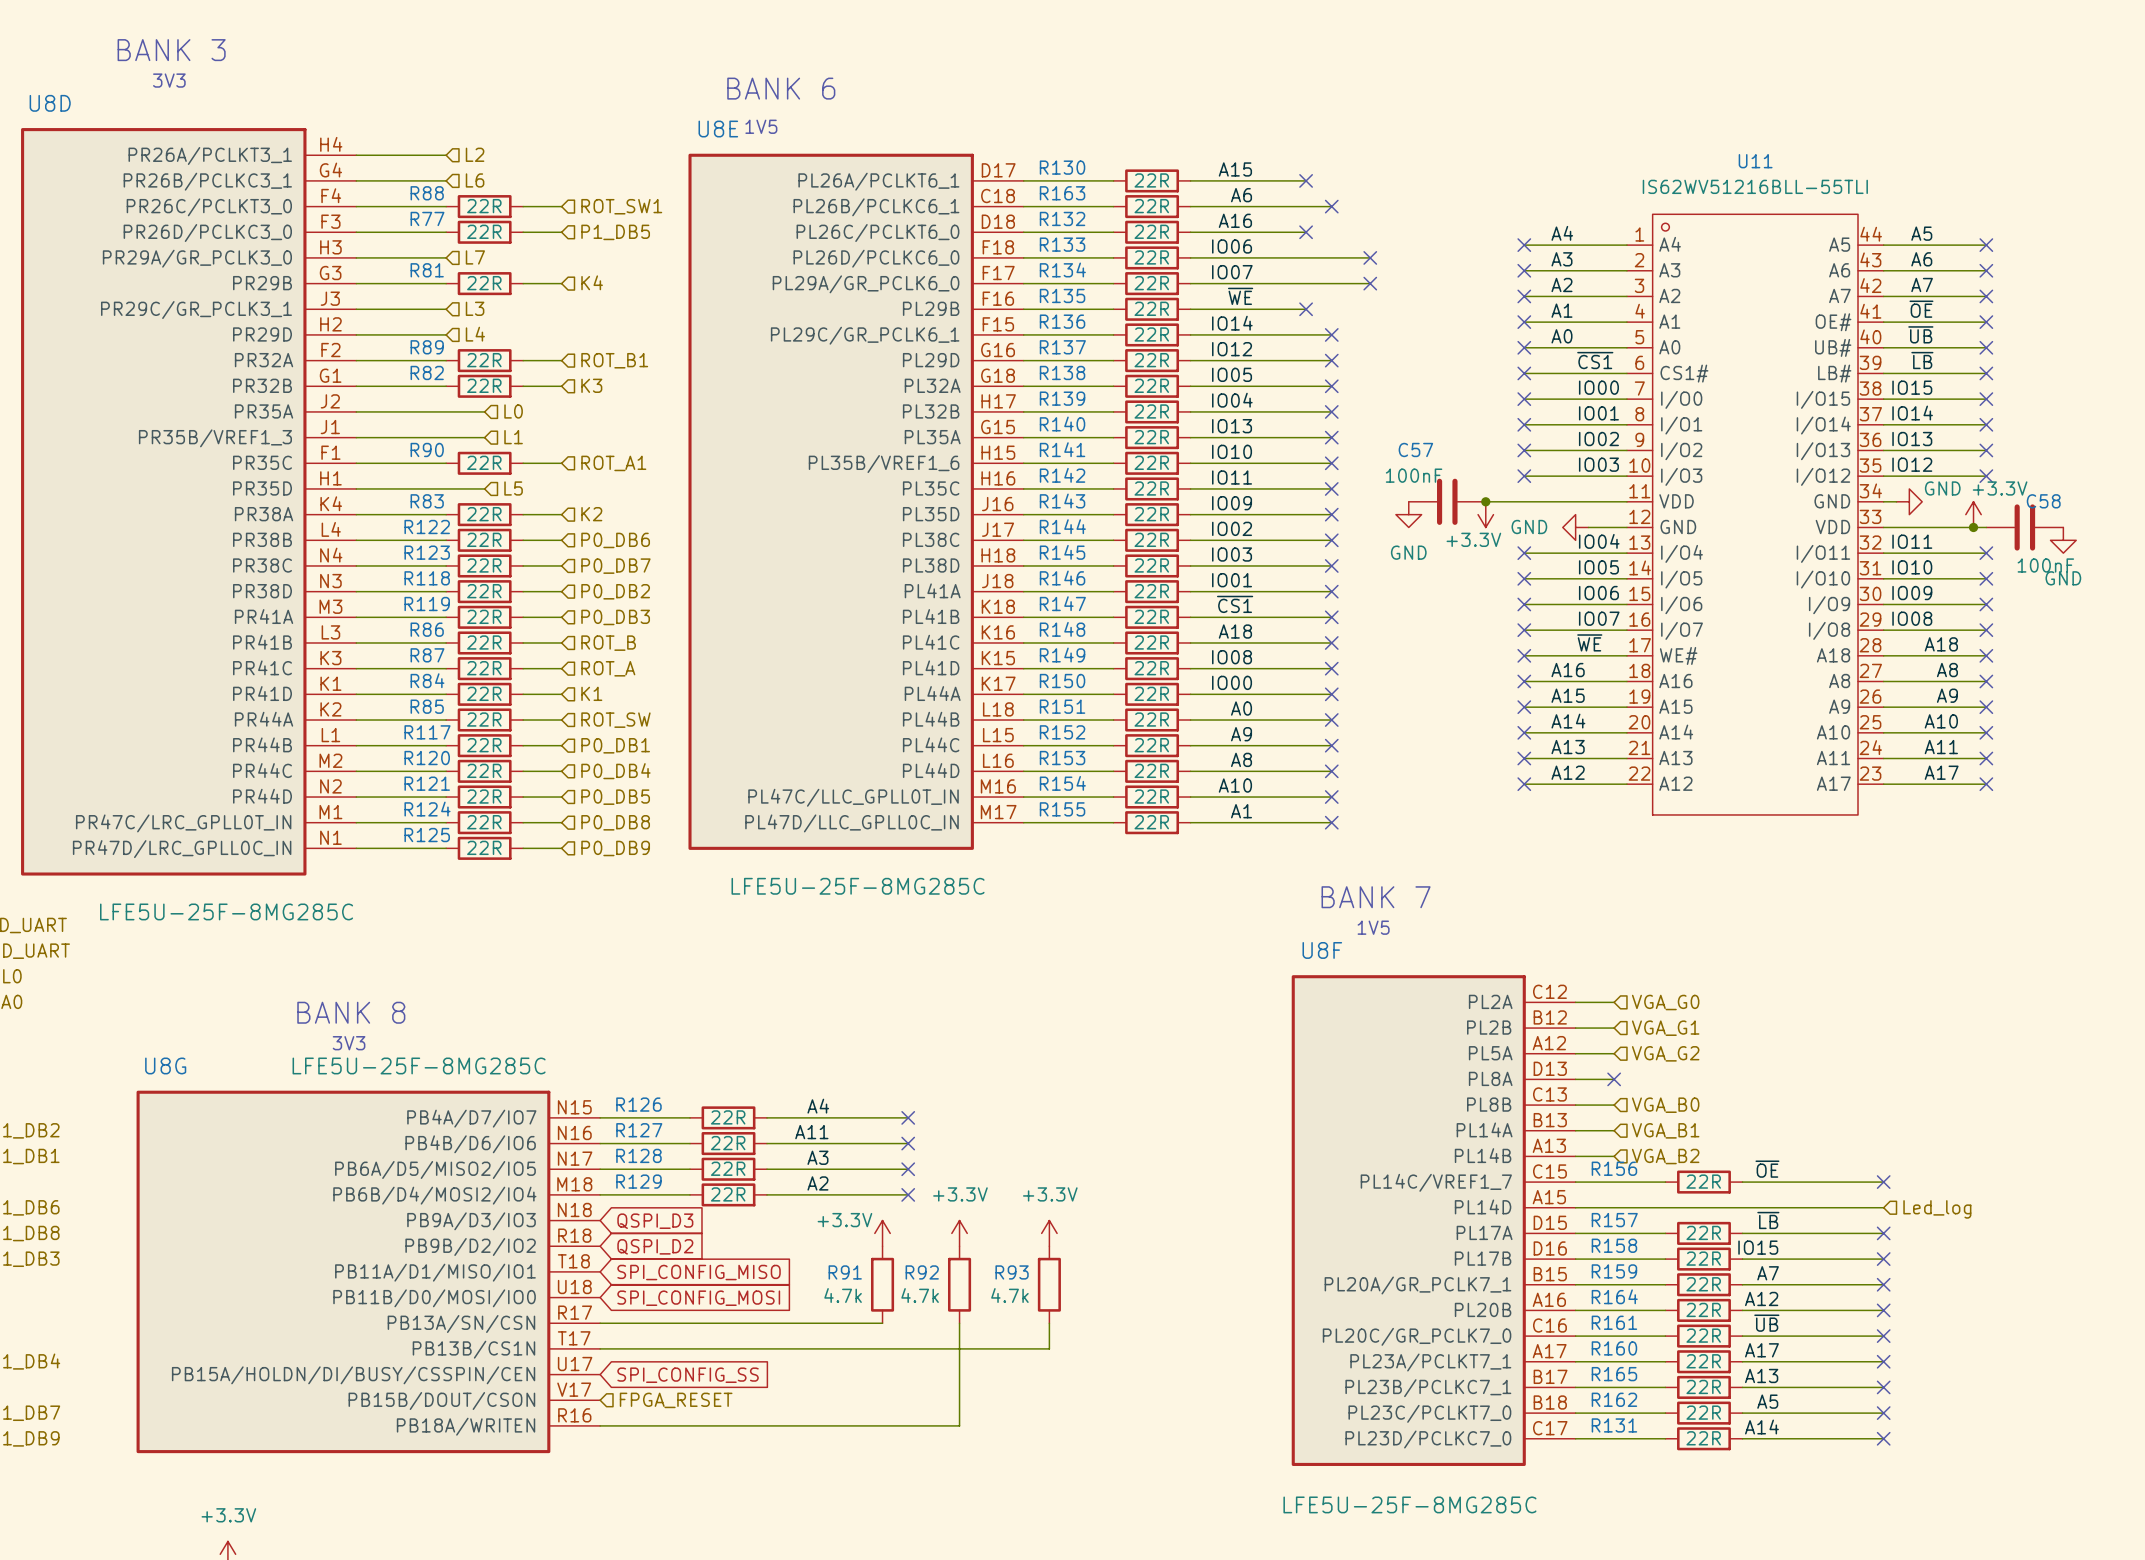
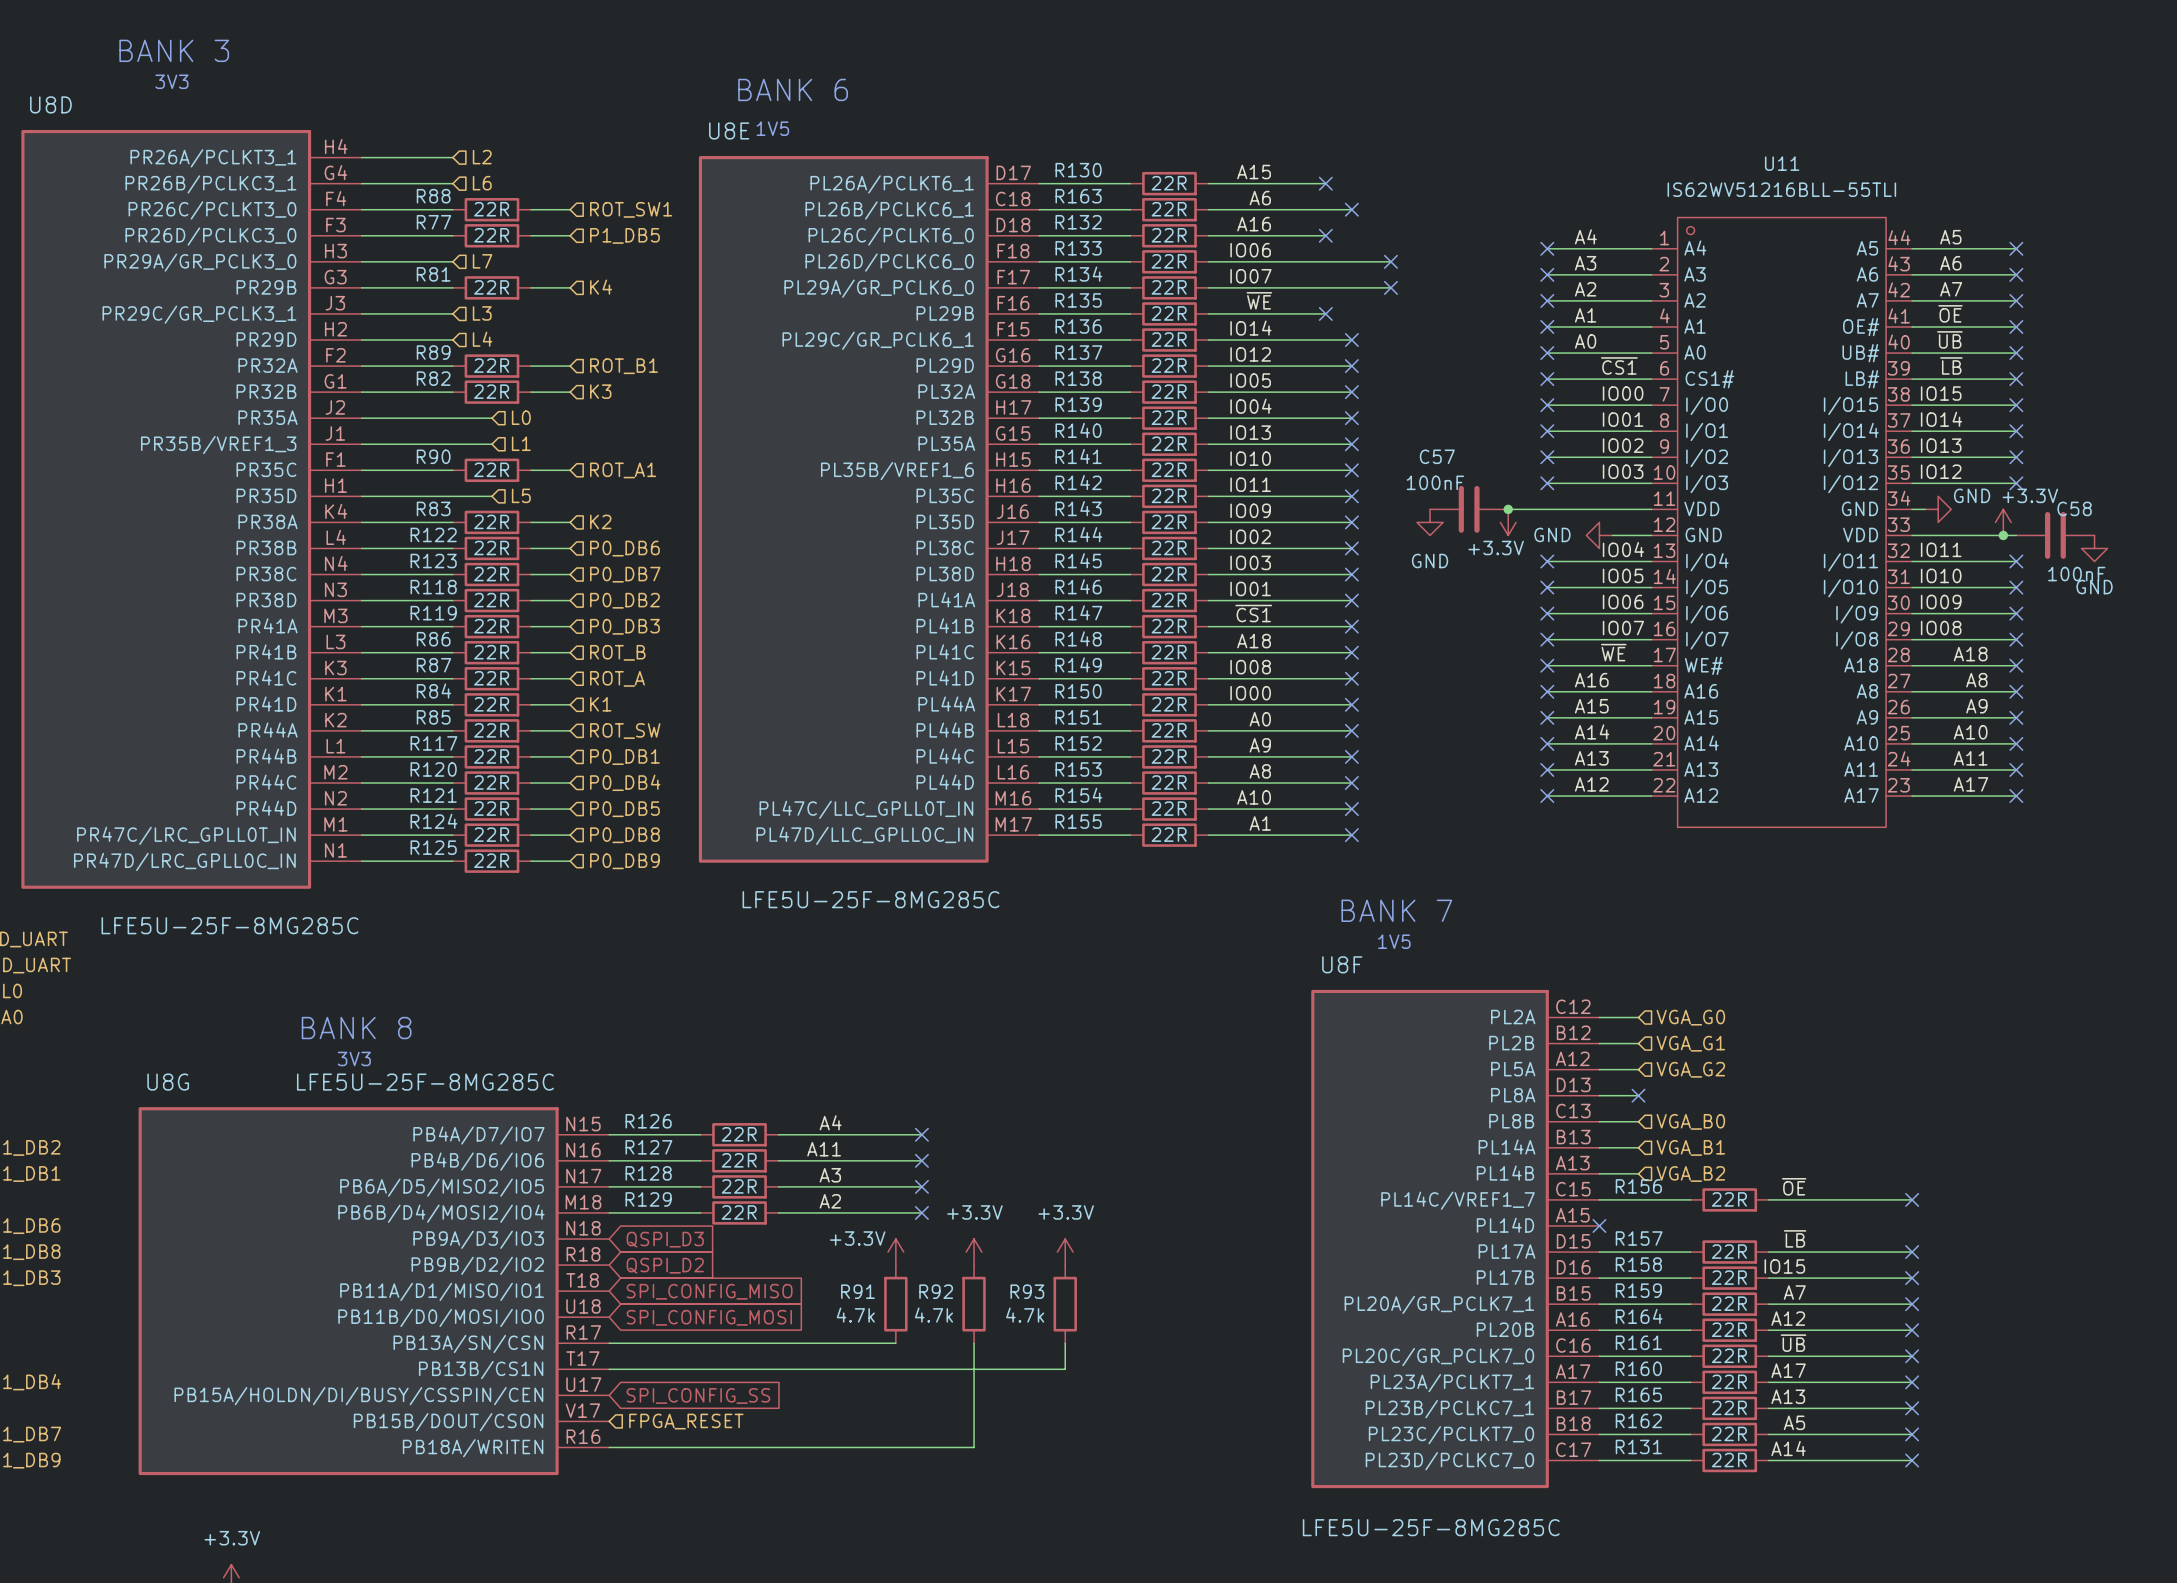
wire: (1575, 1207) (1883, 1207) -> none
no-connect mark: none -> (1599, 1225)
hierarchical label: Led_log (1937, 1209) -> none

